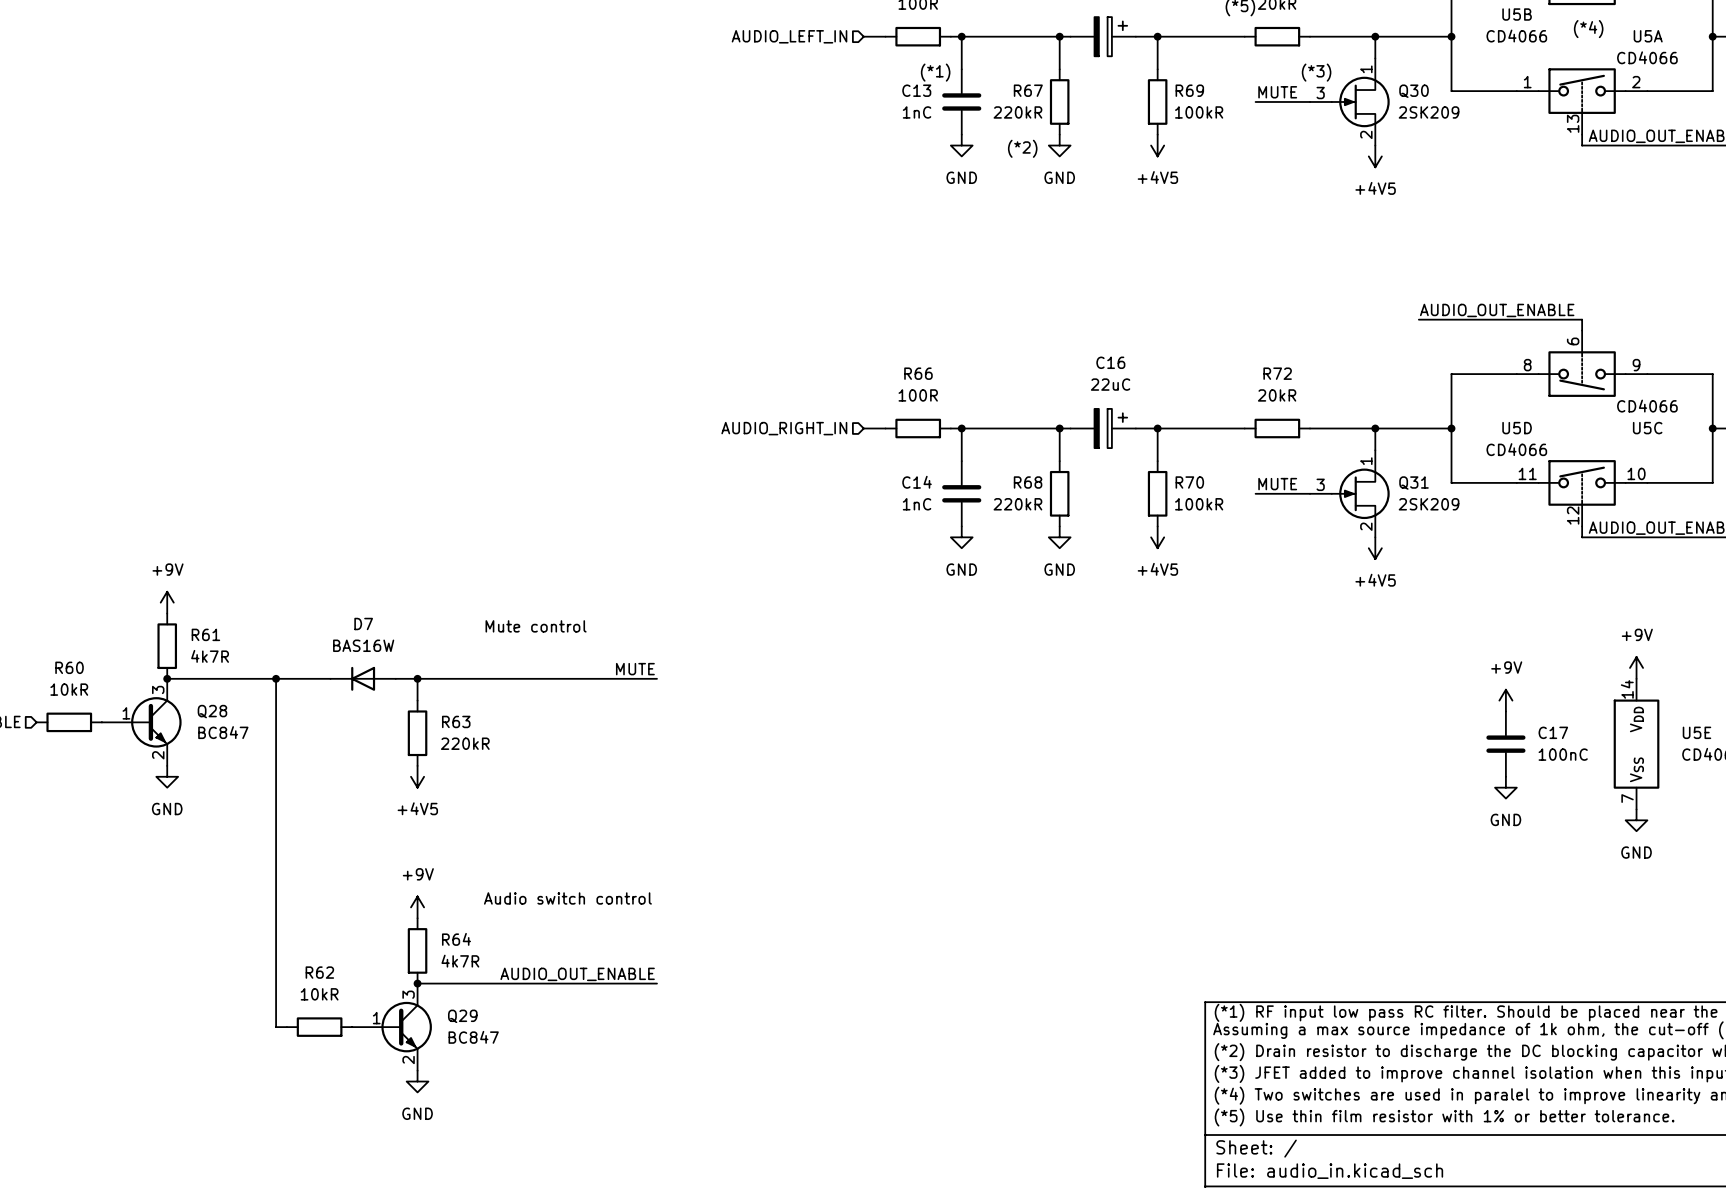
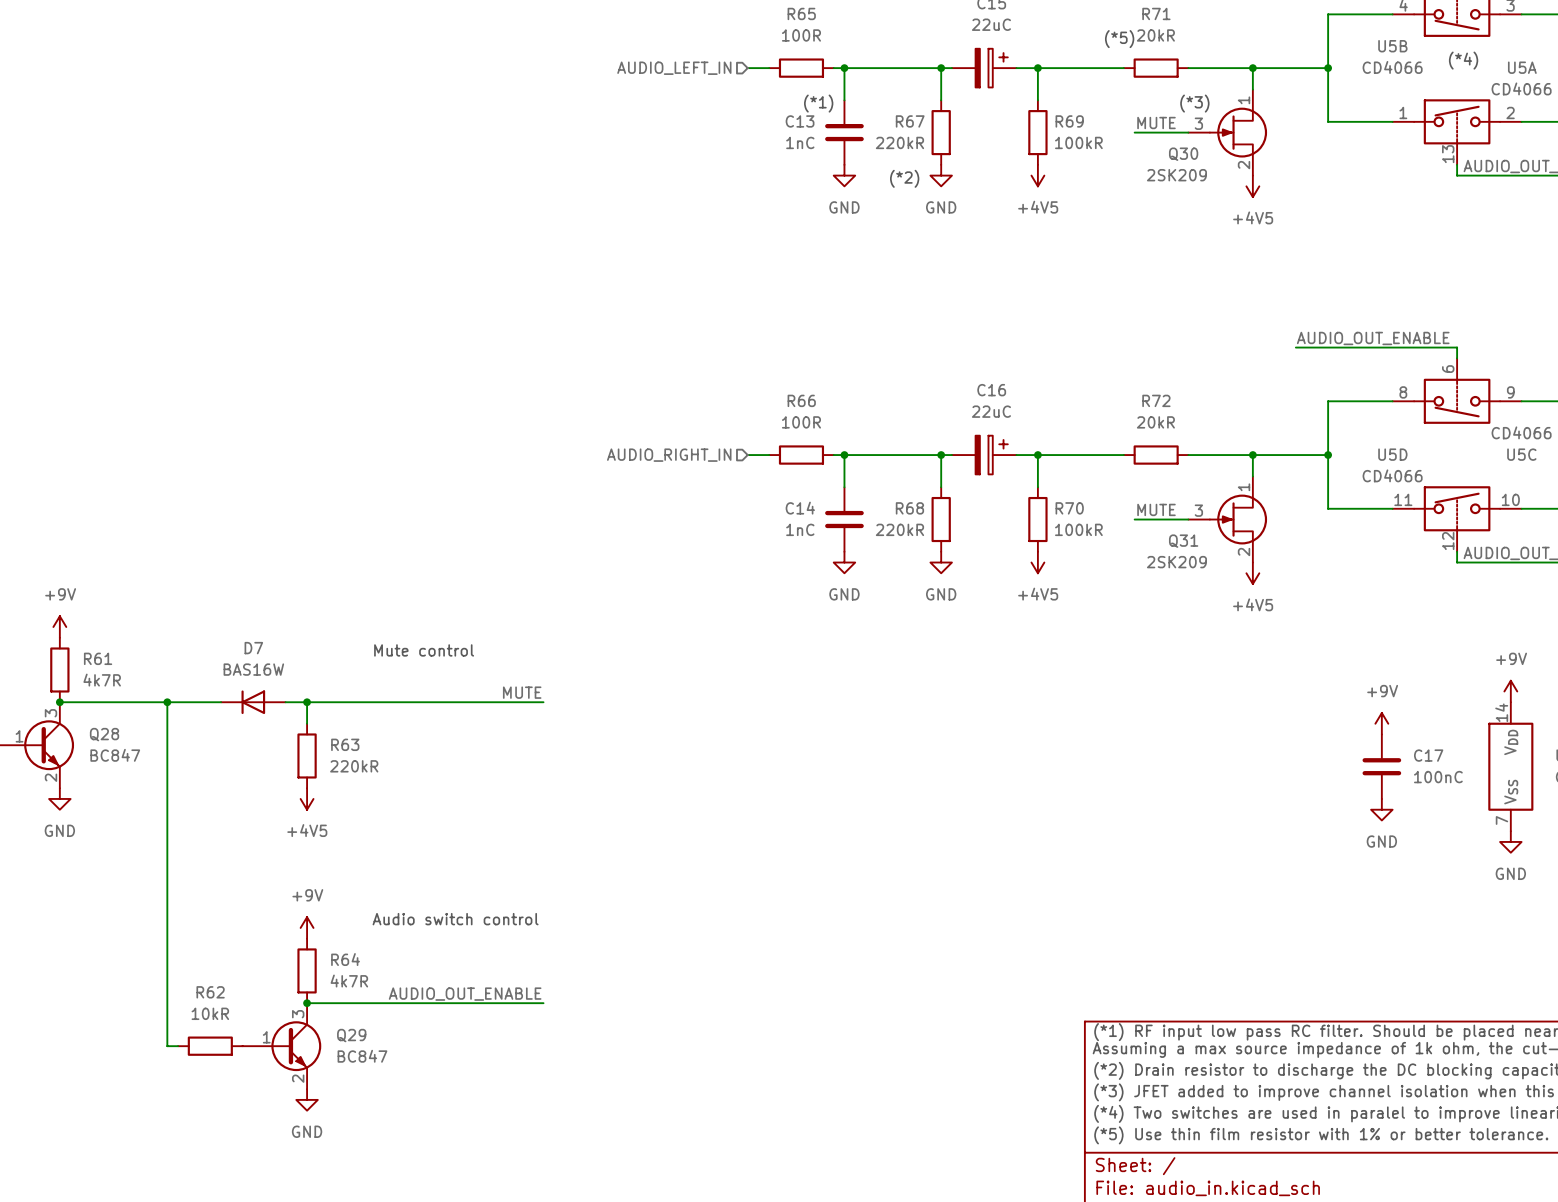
Q30 name position: Q30 (1414, 91) -> Q30 (1183, 154)
Q30 value position: 2SK209 (1429, 112) -> 2SK209 (1176, 175)
Q31 name position: Q31 (1414, 483) -> Q31 (1183, 541)
Q31 value position: 2SK209 (1429, 504) -> 2SK209 (1176, 562)

